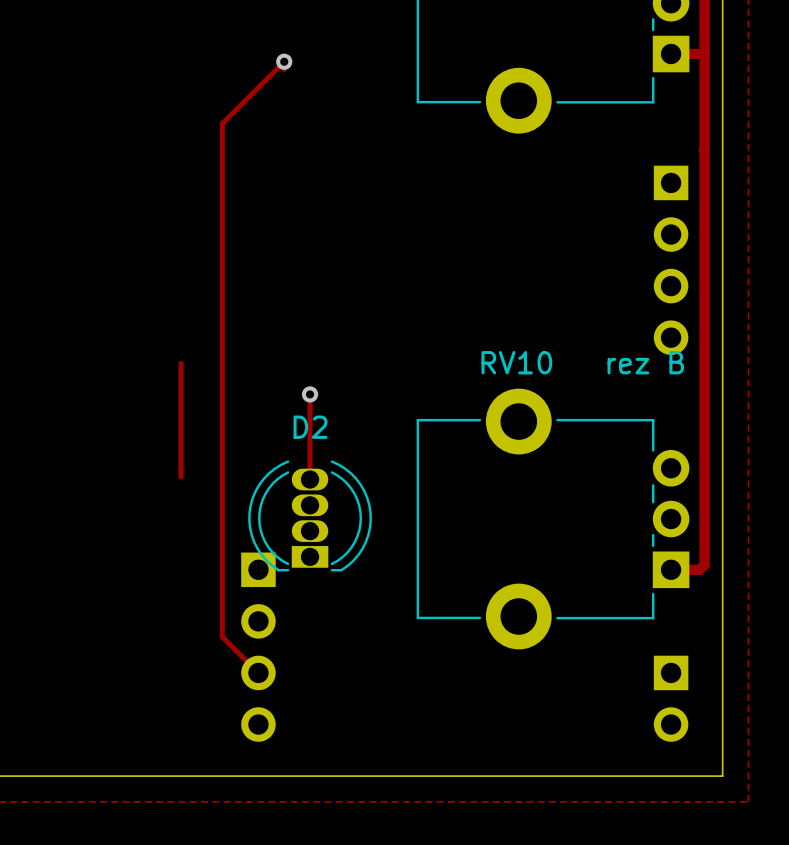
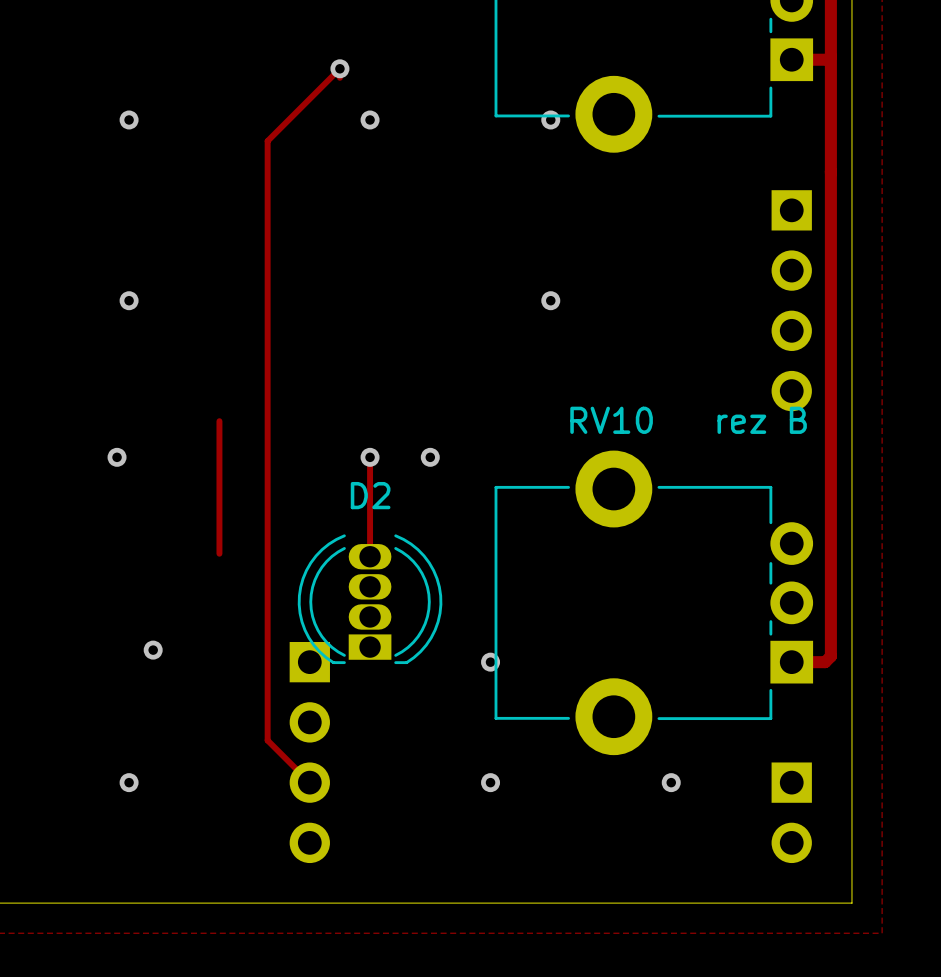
via: none -> (129, 119)
via: none -> (370, 119)
via: none -> (550, 119)
via: none -> (129, 300)
via: none -> (550, 300)
via: none -> (117, 457)
via: none -> (430, 457)
via: none -> (153, 650)
via: none -> (490, 662)
via: none -> (129, 782)
via: none -> (490, 782)
via: none -> (671, 782)

